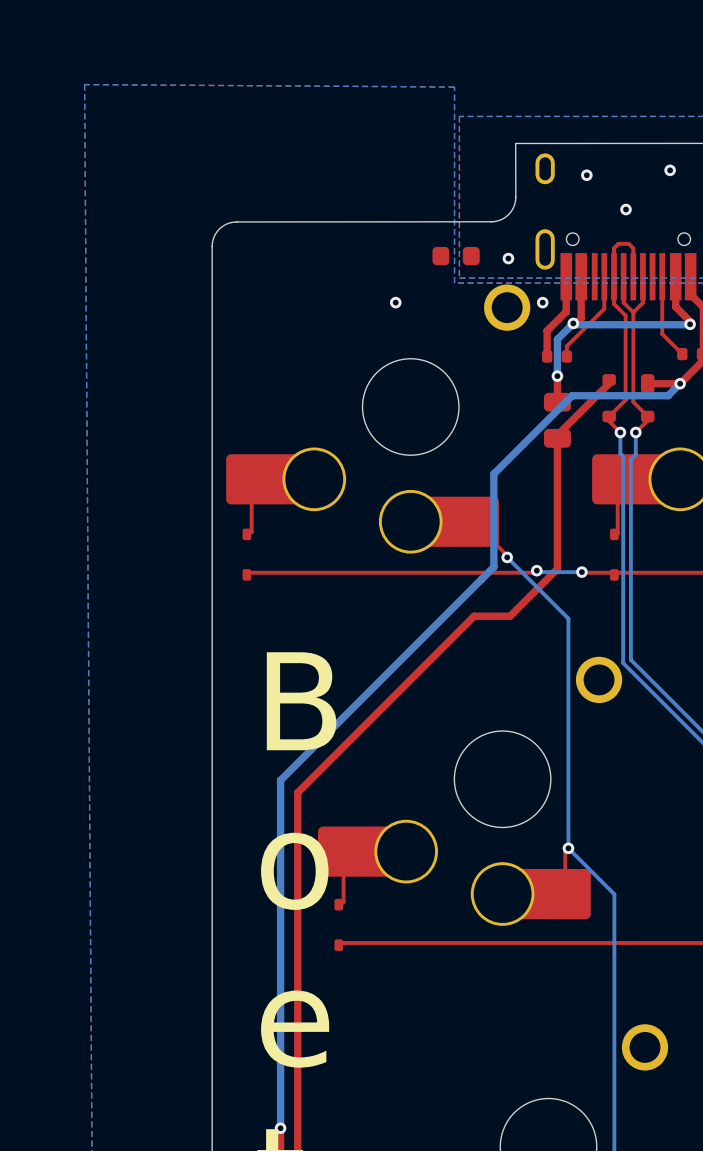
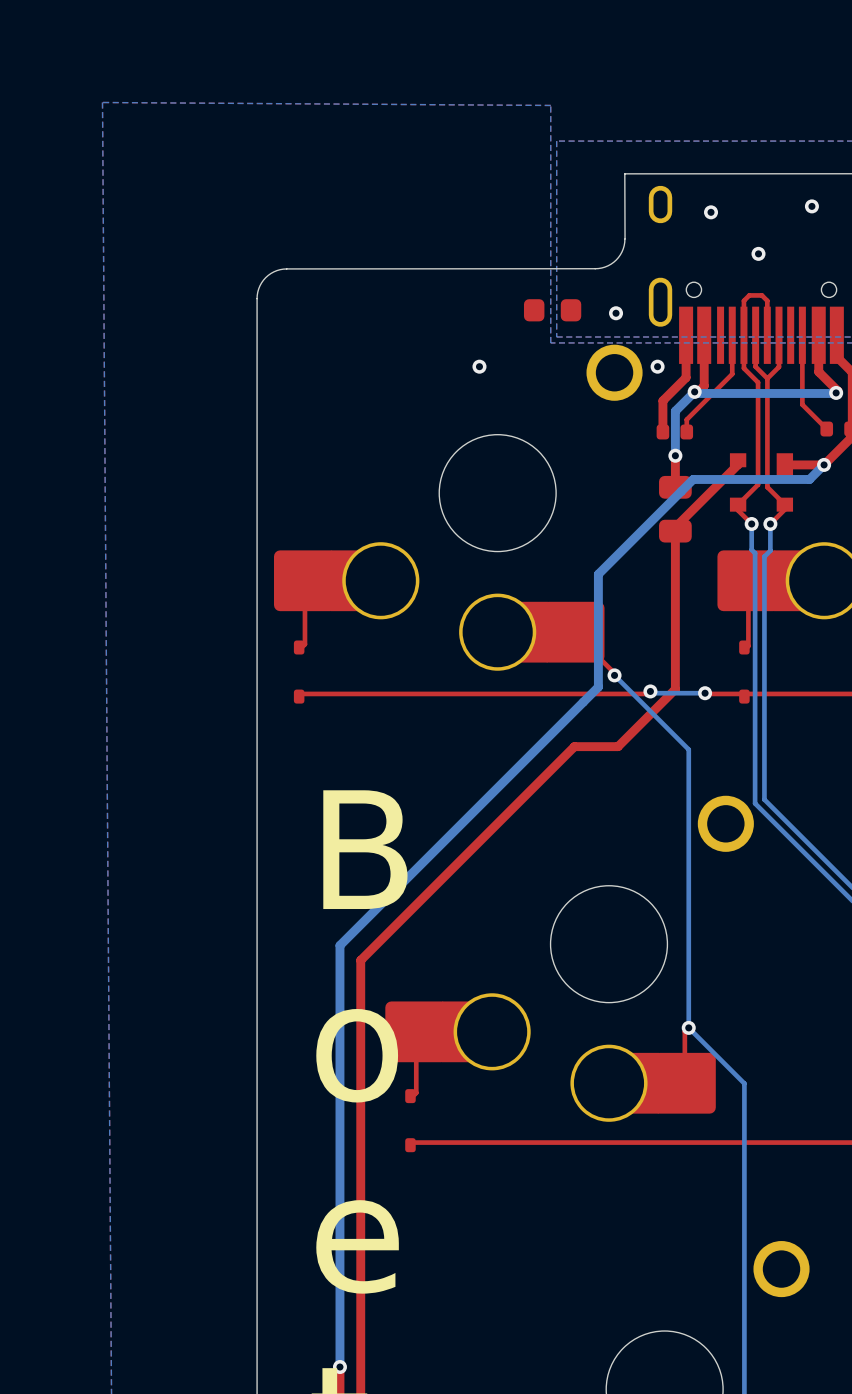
part footprint: [602, 374, 655, 423] -> [729, 453, 794, 512]

